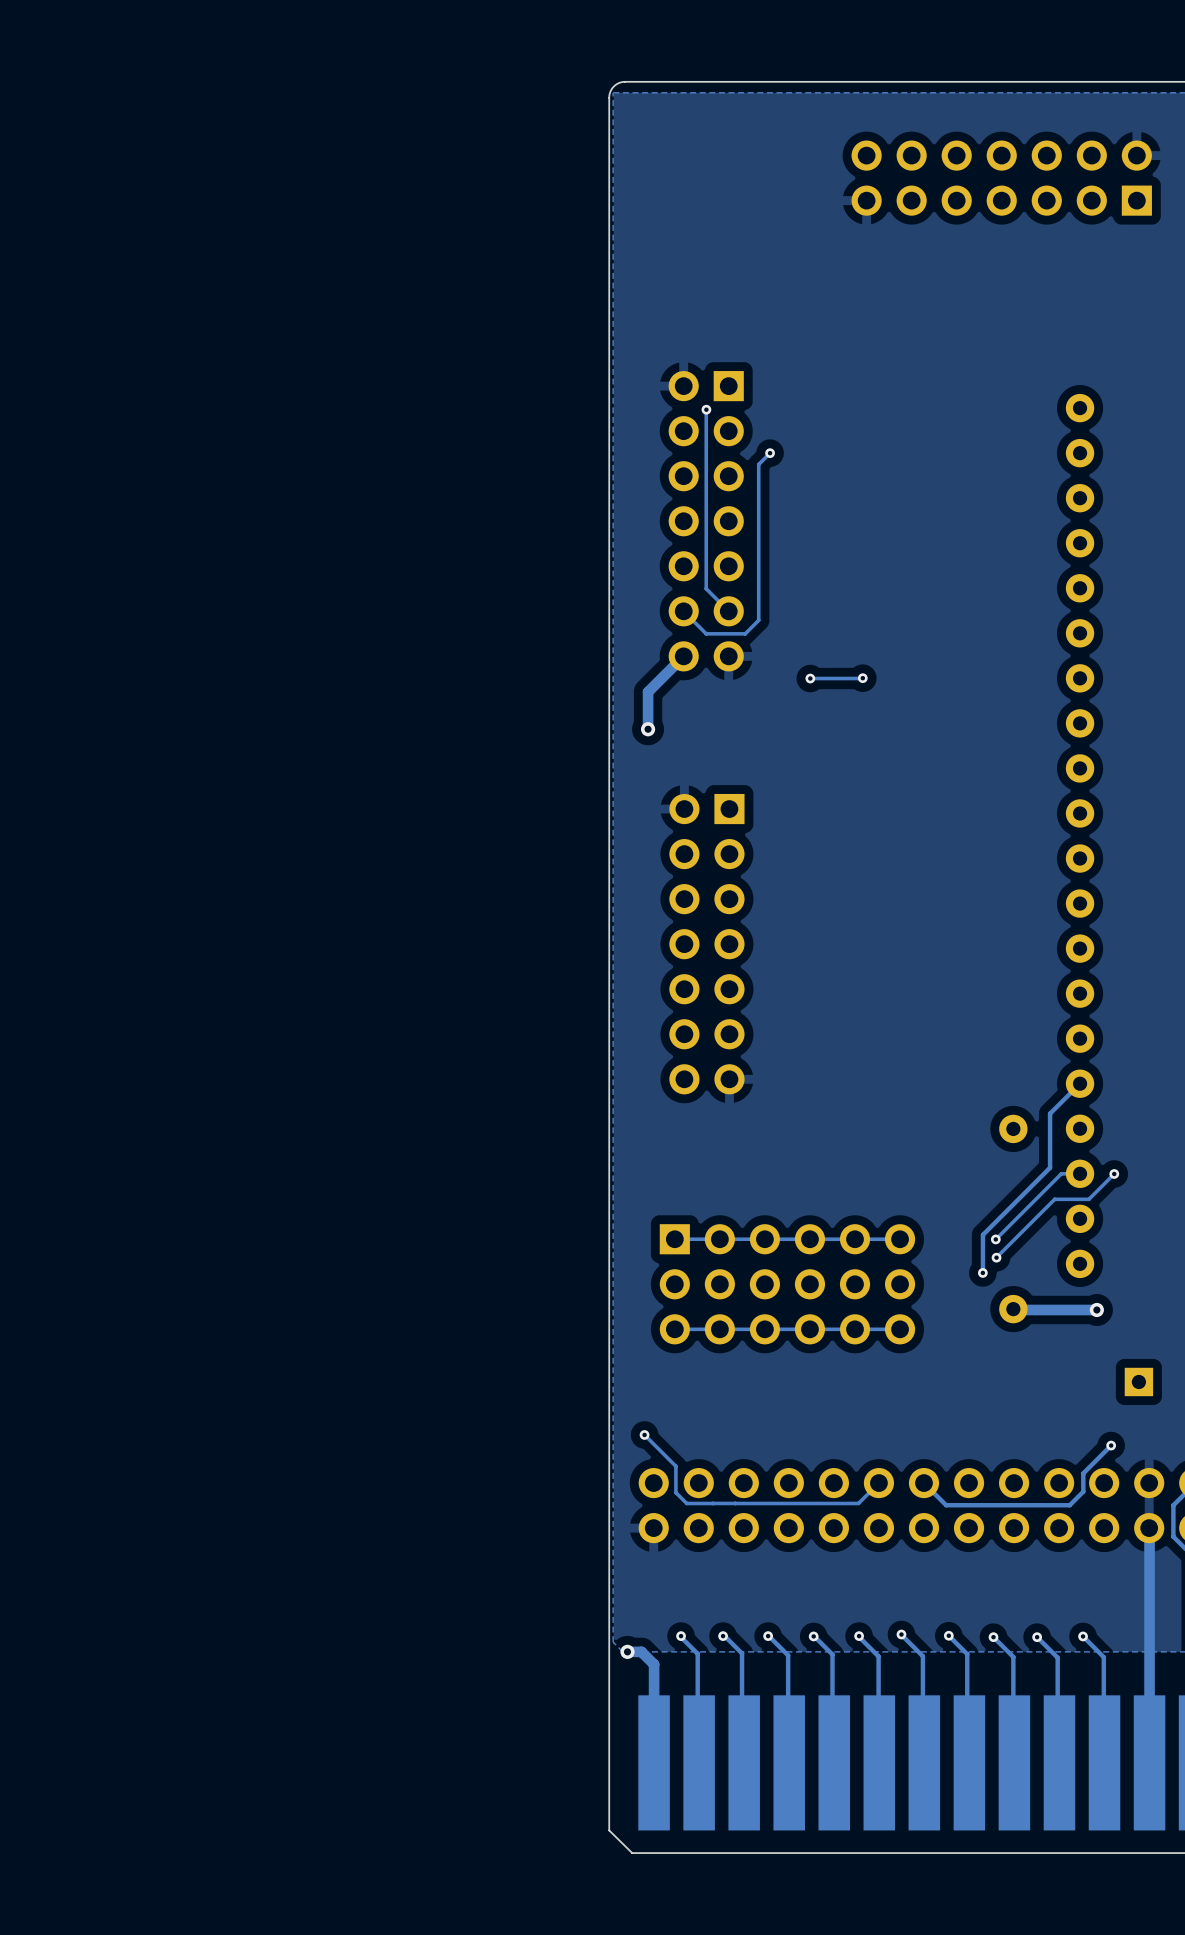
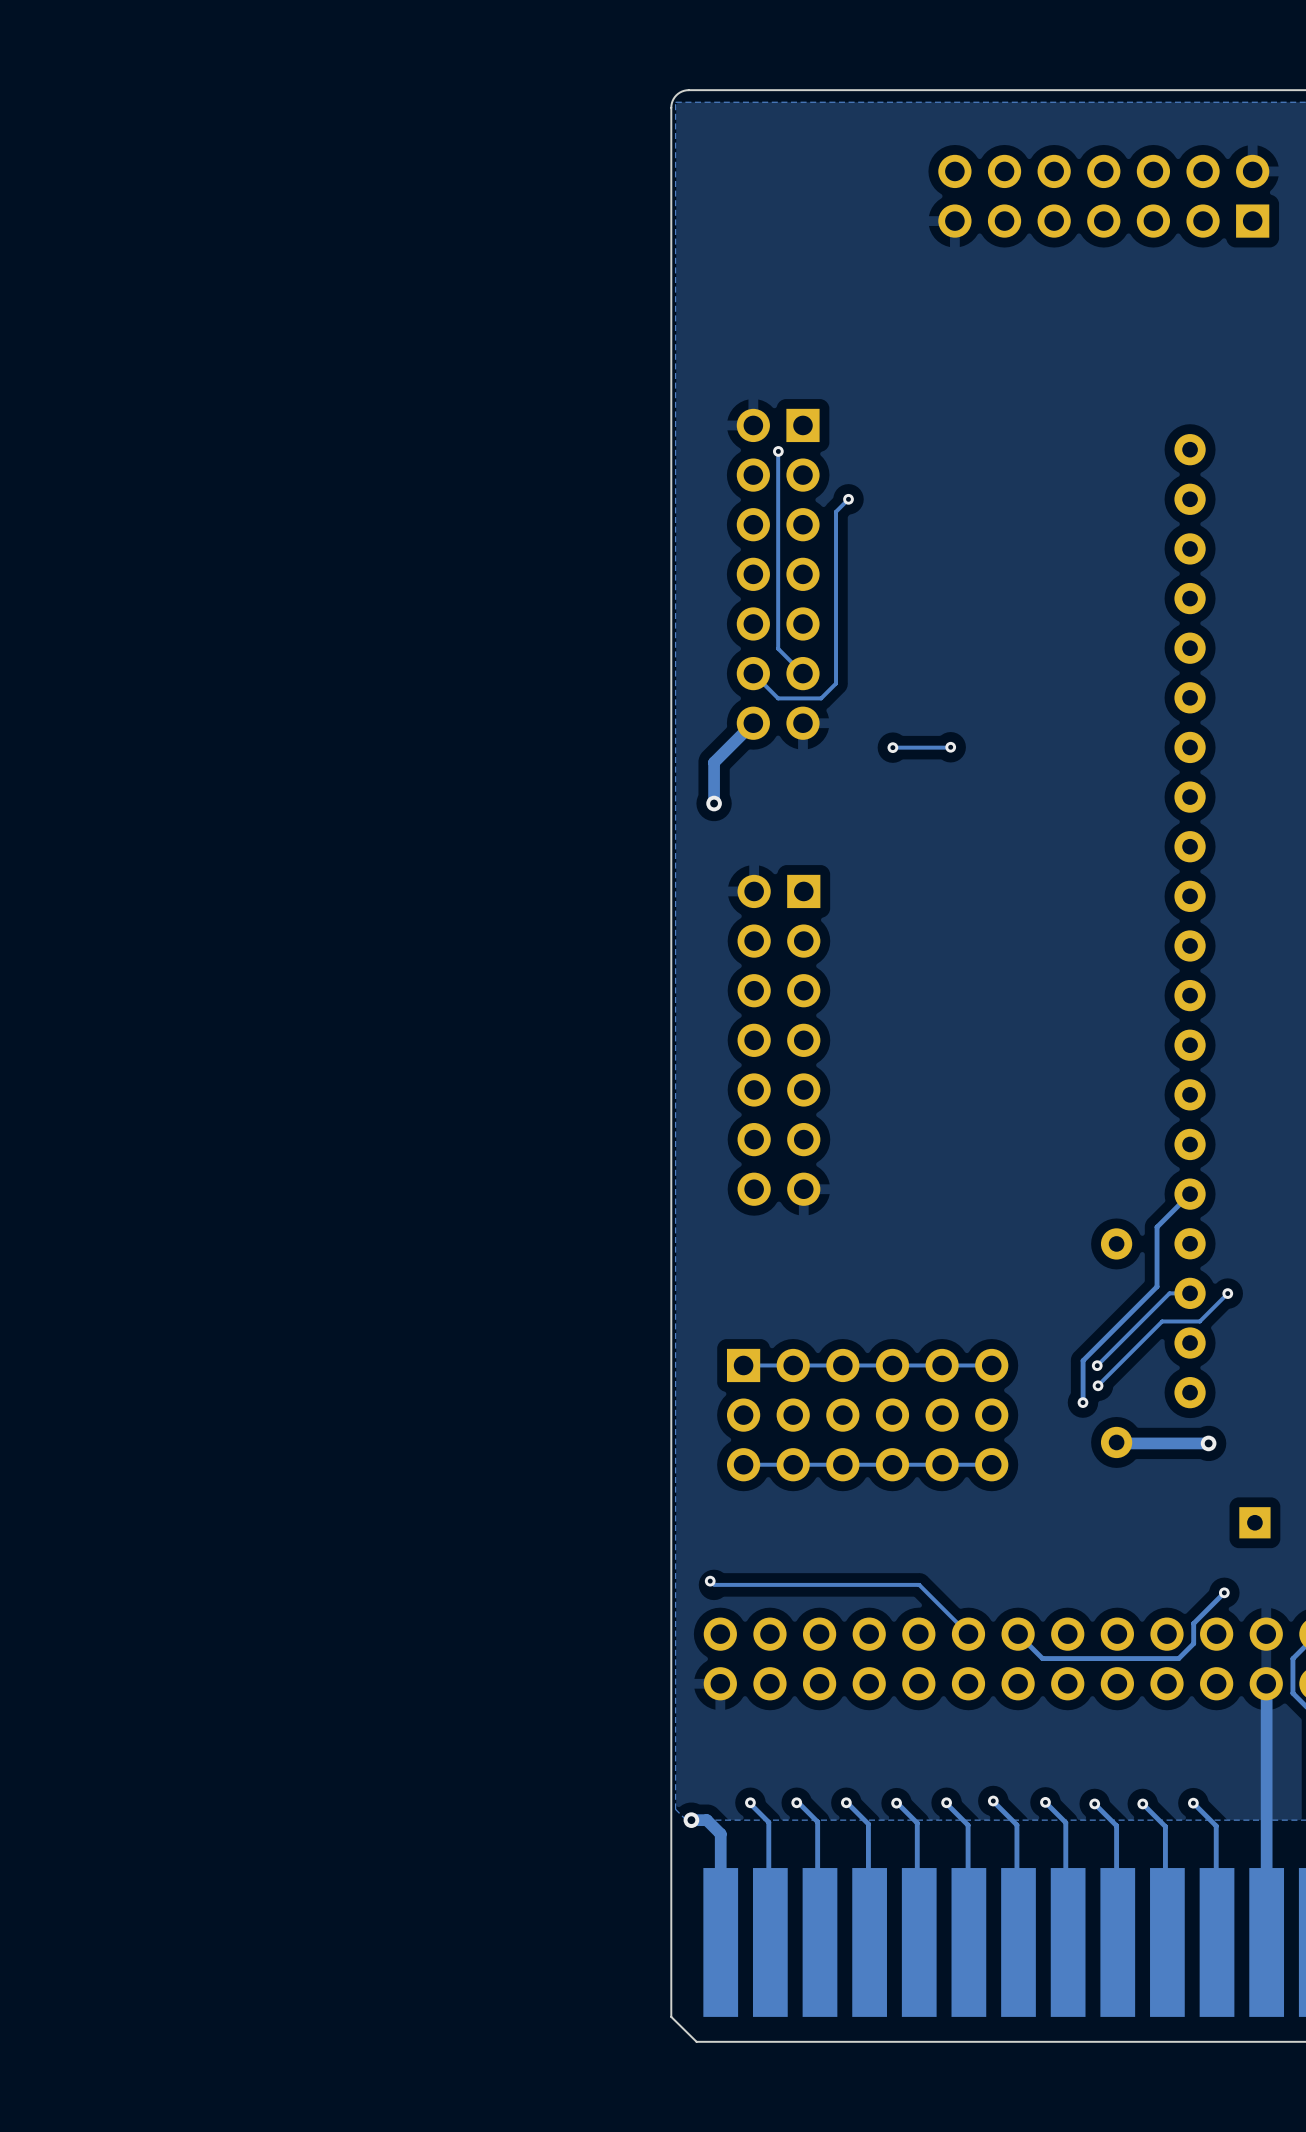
track: (644, 1434) (675, 1466) (675, 1492) (686, 1503) (858, 1503) (878, 1483) -> (713, 1584) (919, 1584) (968, 1634)

